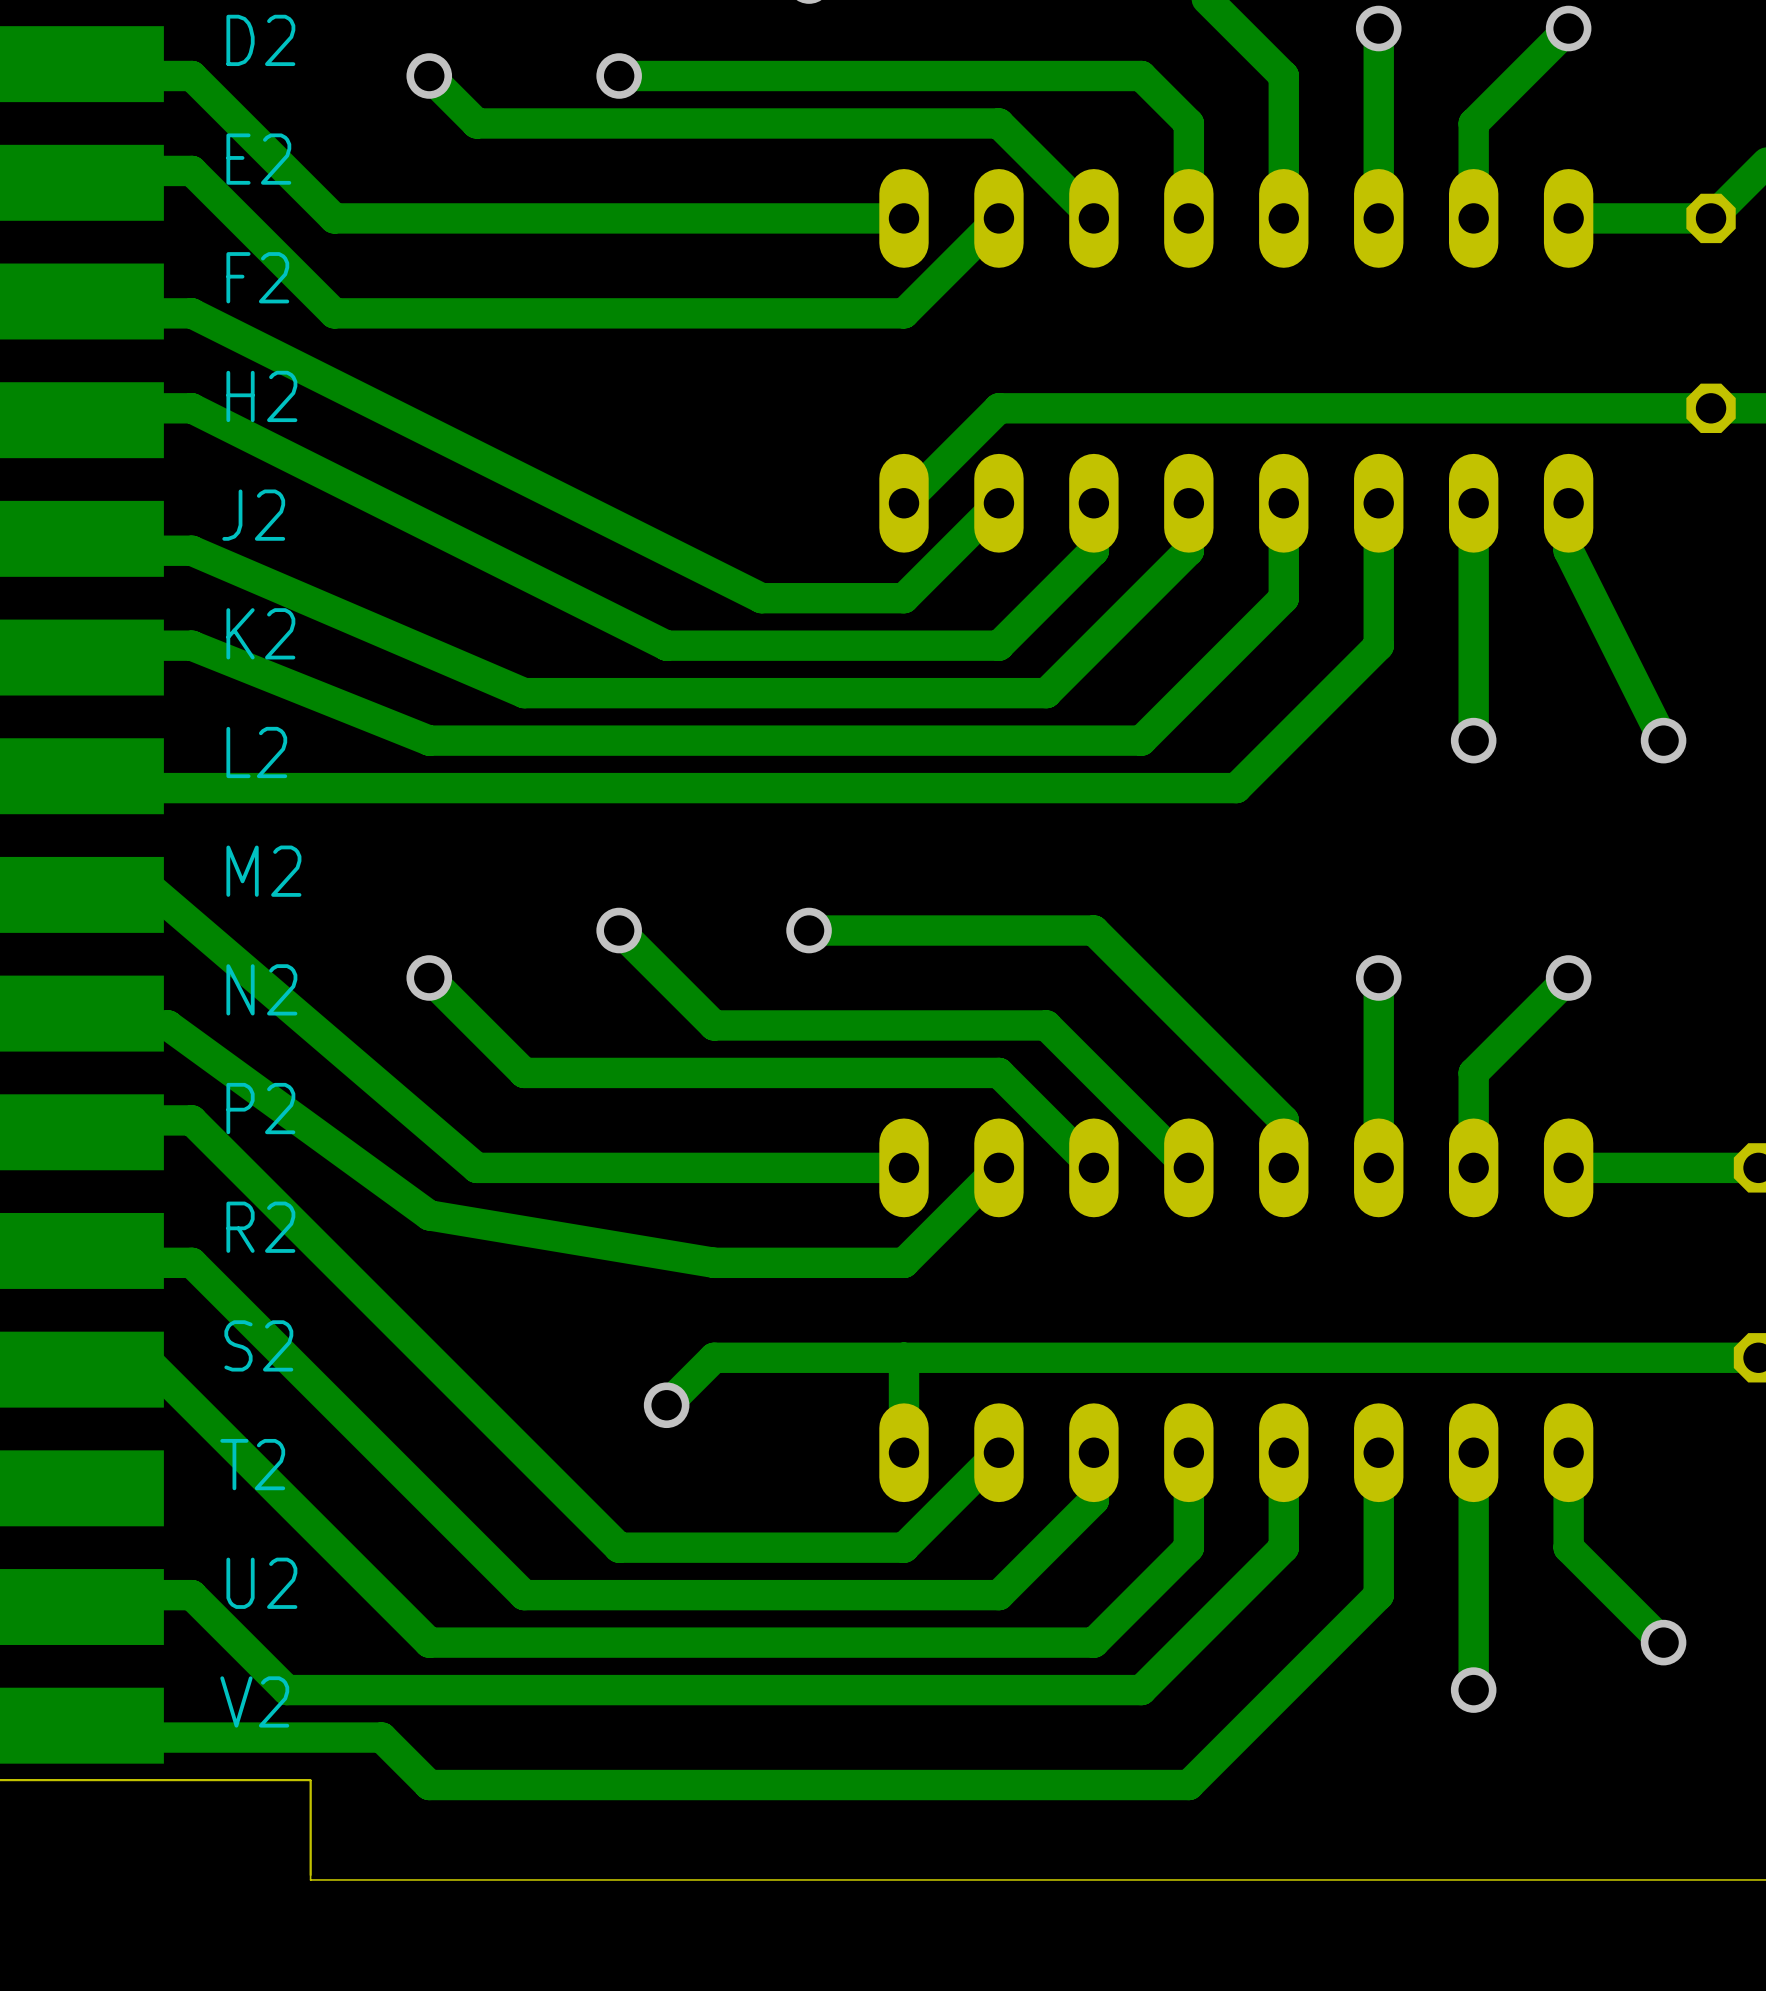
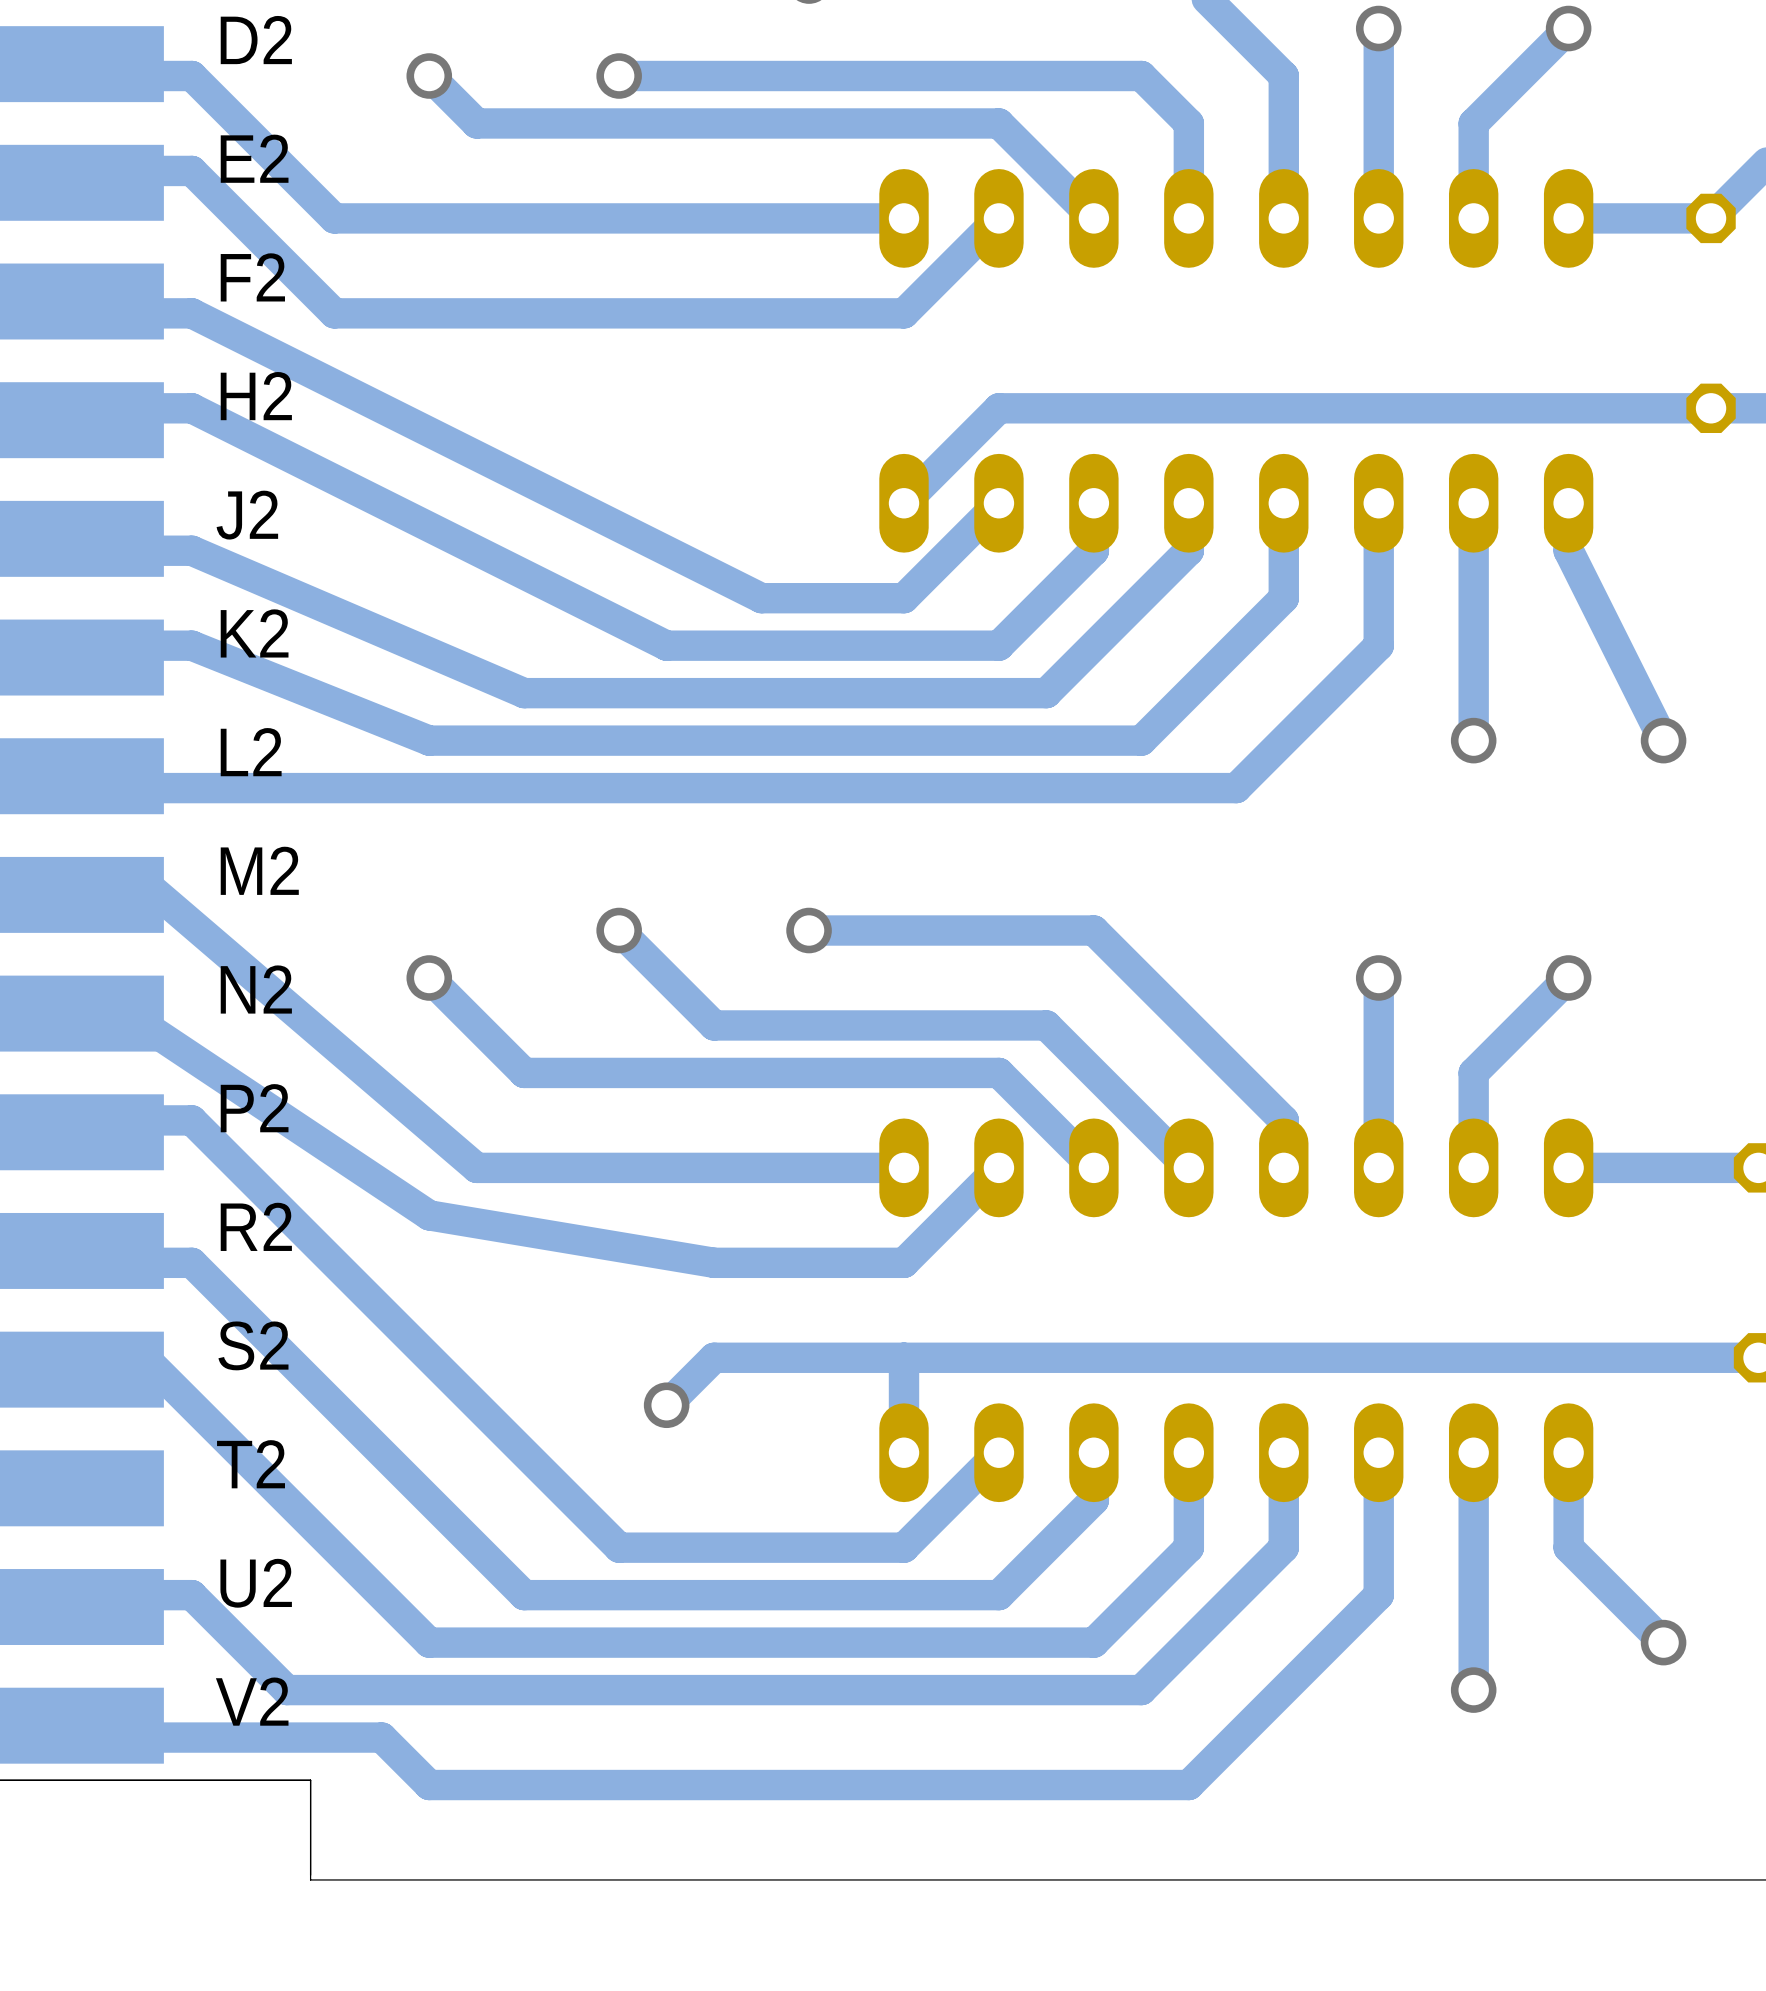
track: (144, 1025) (168, 1025) (429, 1215) -> (144, 1025) (429, 1215)

